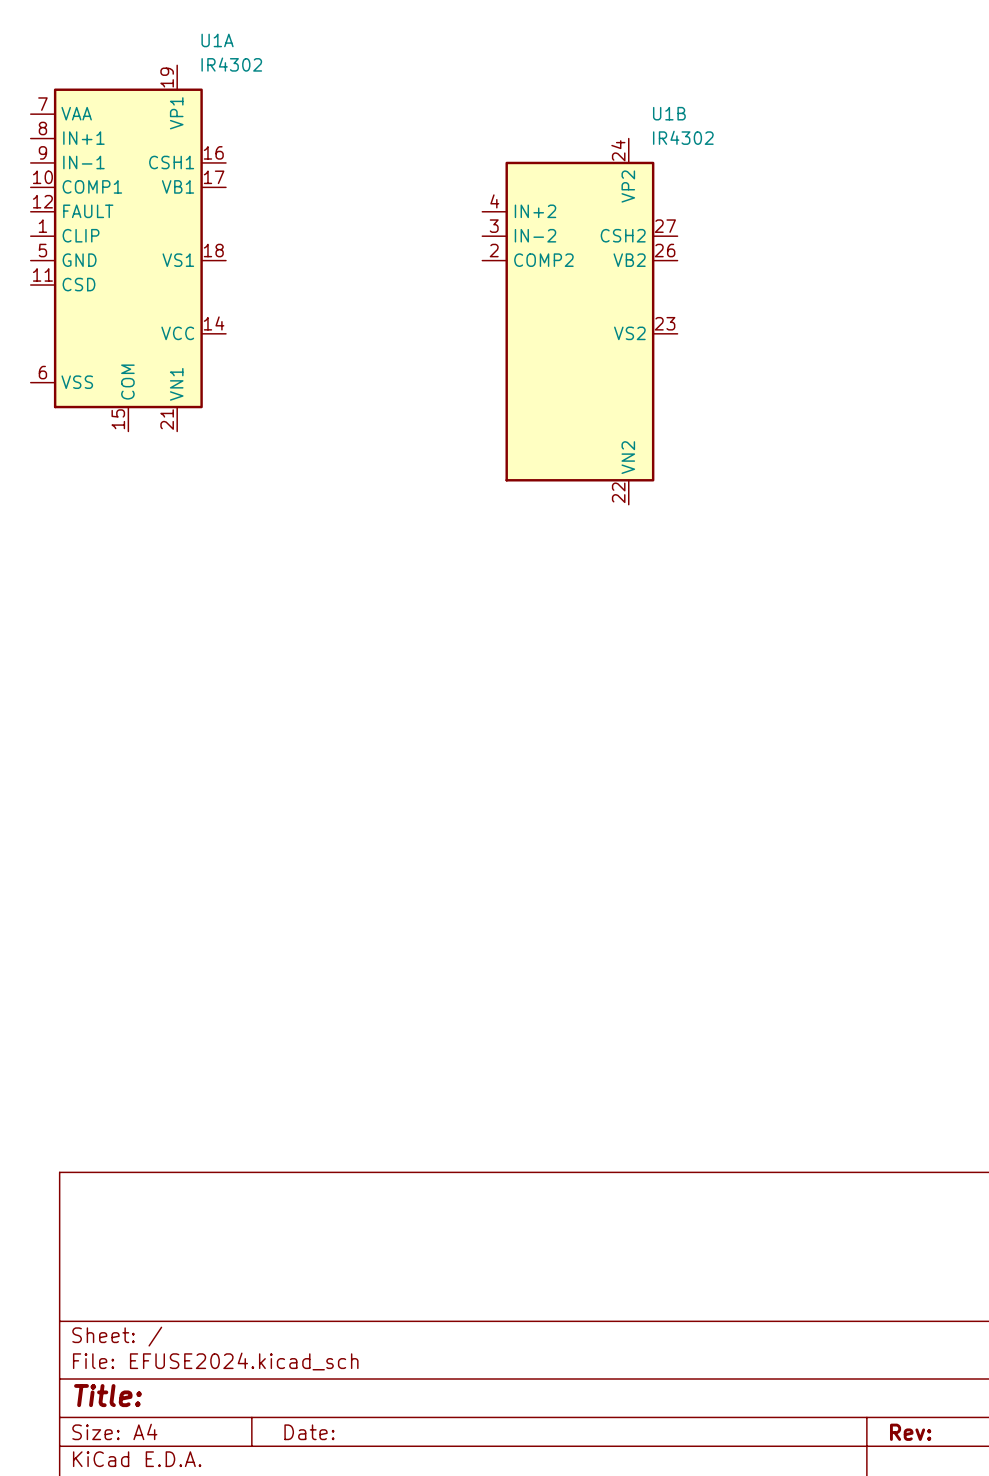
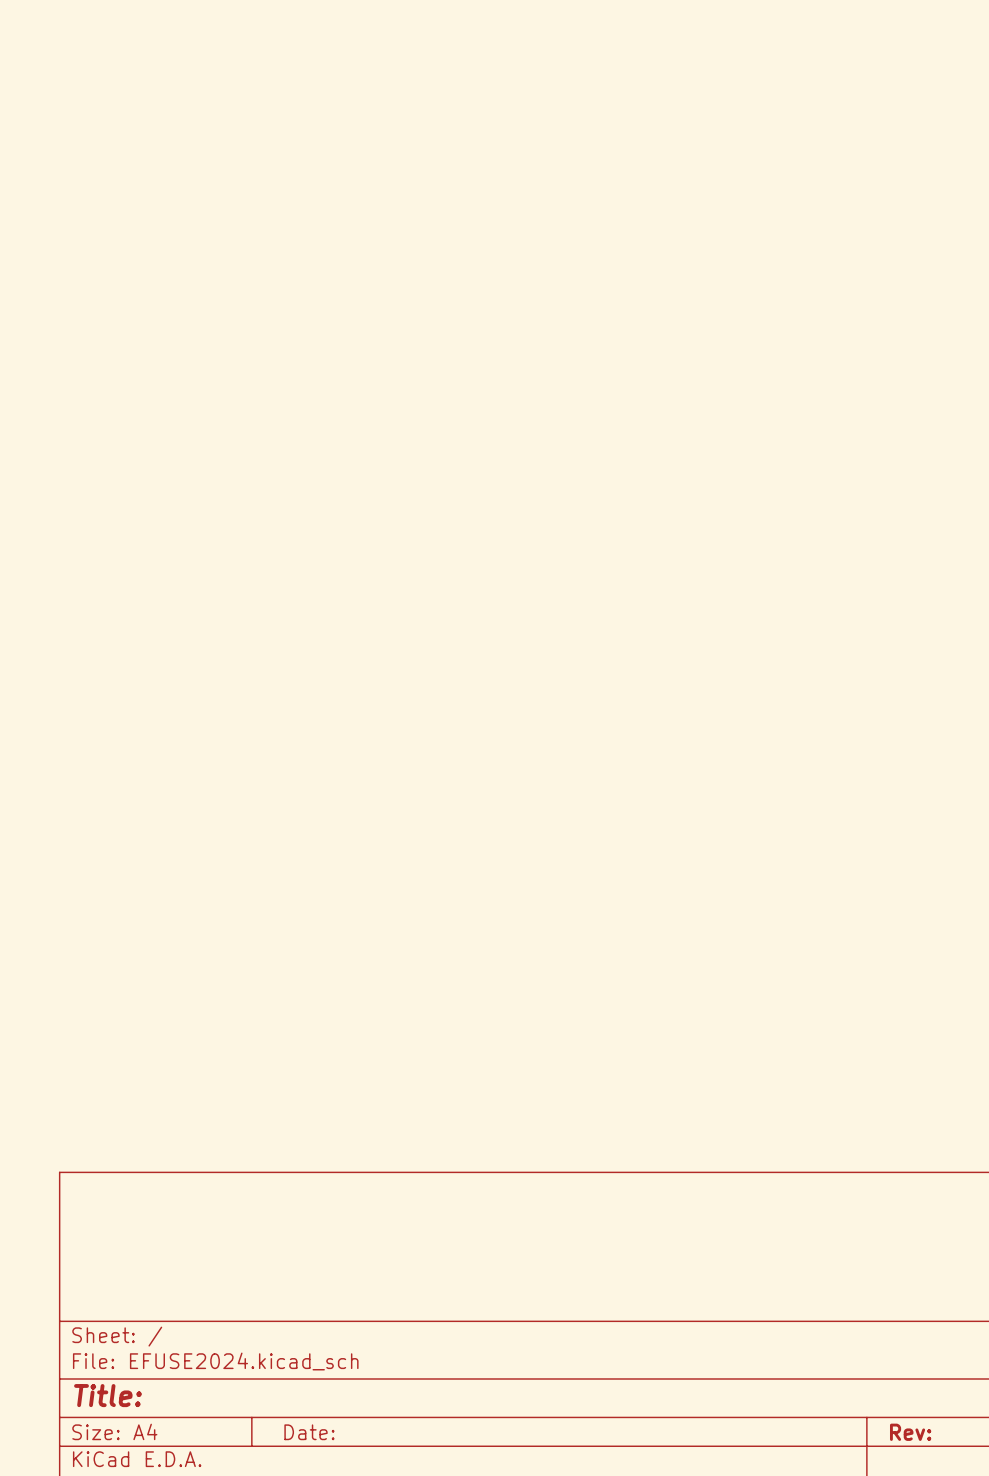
U1A: IR4302 (128, 248) -> none
U1B: IR4302 (579, 321) -> none

